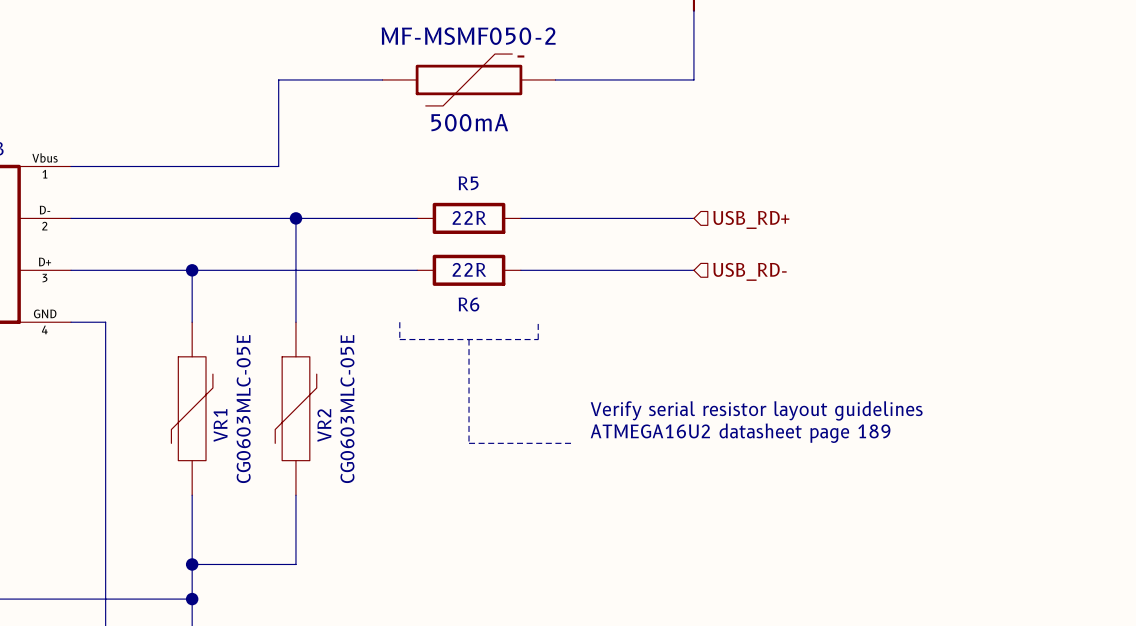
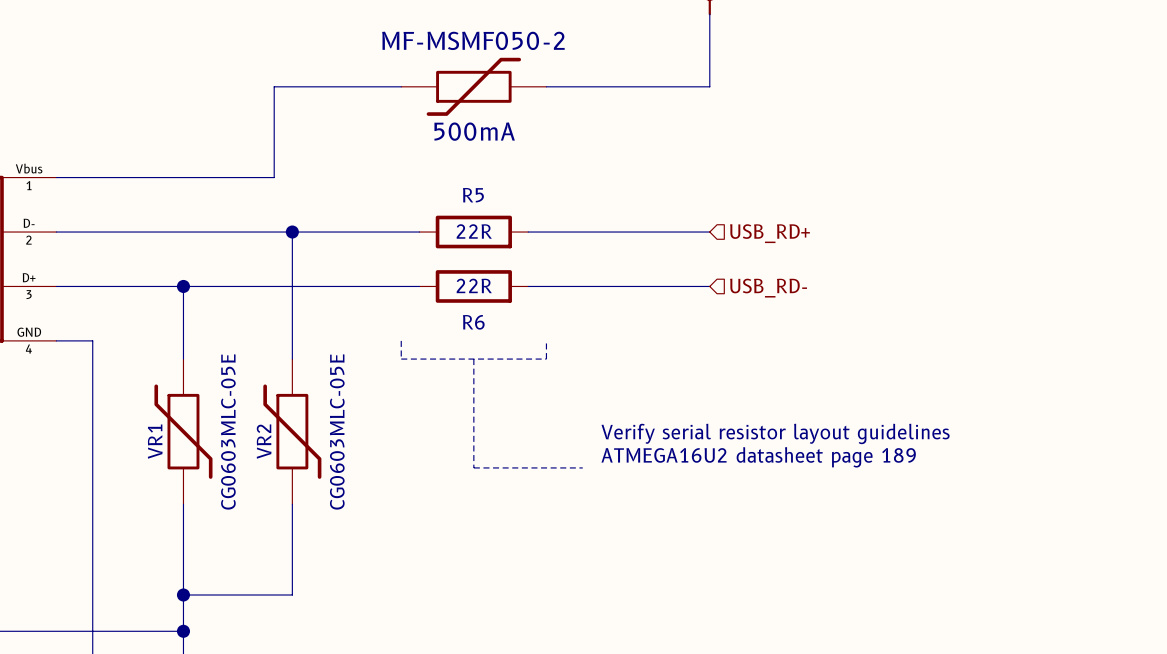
MF-MSMF050-2 symbol: [382, 54, 556, 106] -> [401, 57, 547, 116]
VR1 symbol: [171, 322, 213, 496] -> [154, 359, 213, 505]
VR2 symbol: [275, 322, 317, 496] -> [263, 359, 322, 505]
VR1 name position: VR1 (220, 425) -> VR1 (155, 441)
VR2 name position: VR2 (324, 425) -> VR2 (264, 441)

